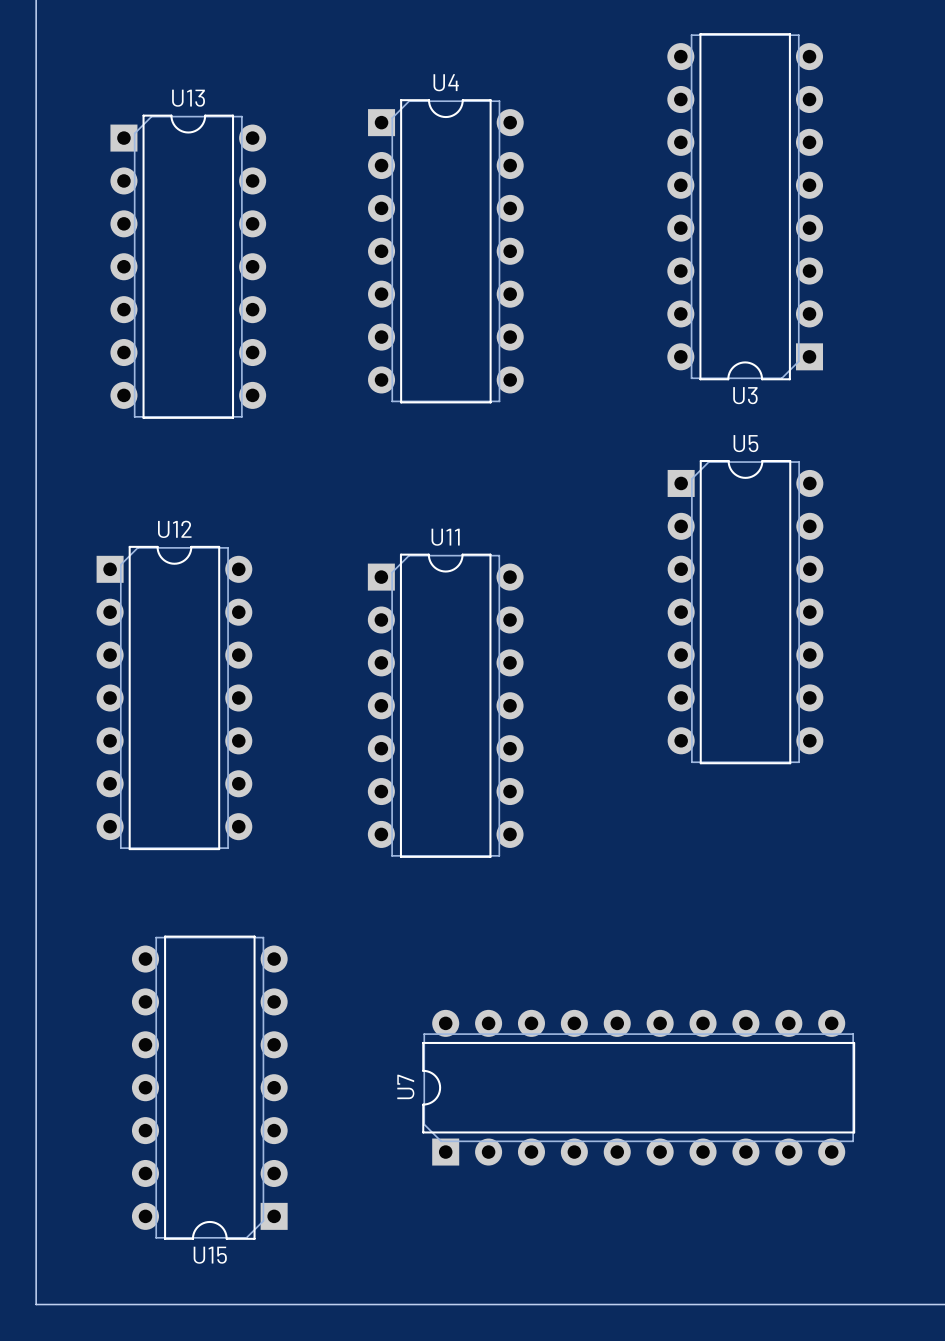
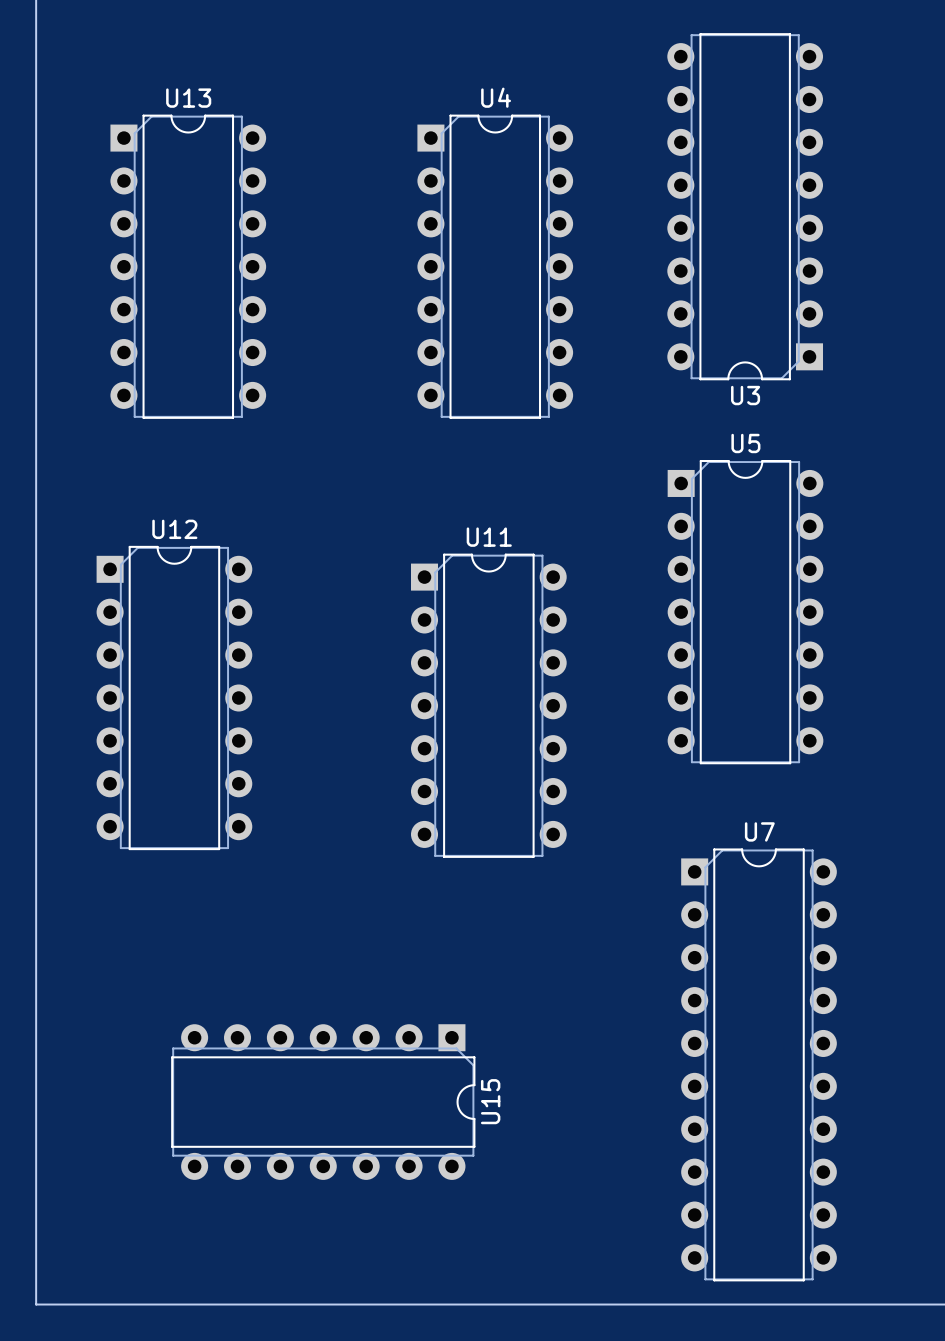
U4 position: (445, 251) -> (495, 266)
U11 position: (445, 705) -> (488, 705)
U15 rotation: 0° (209, 1087) -> 90° counterclockwise (323, 1102)
U7 rotation: 0° (638, 1087) -> 90° clockwise (759, 1064)

